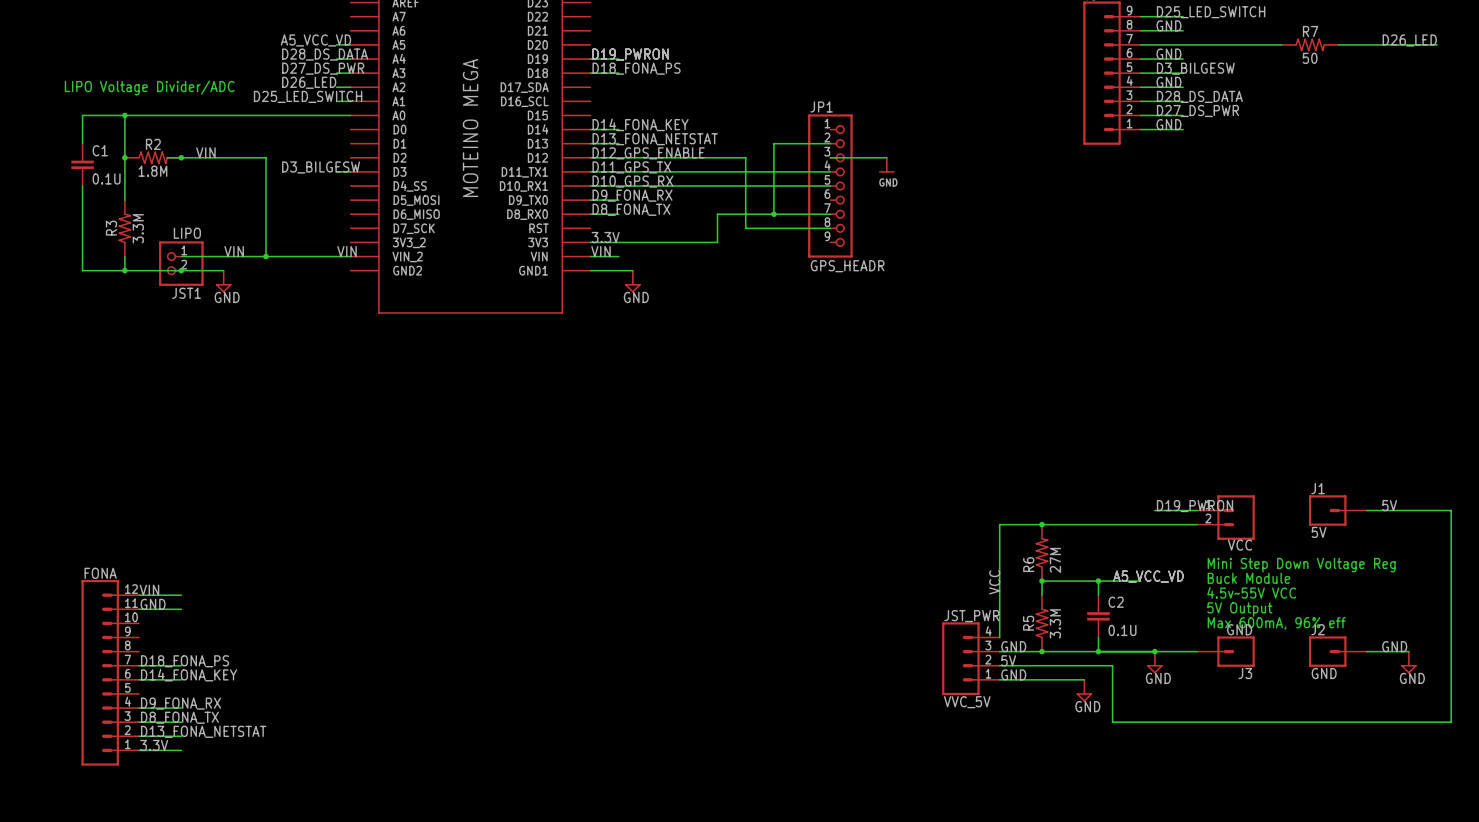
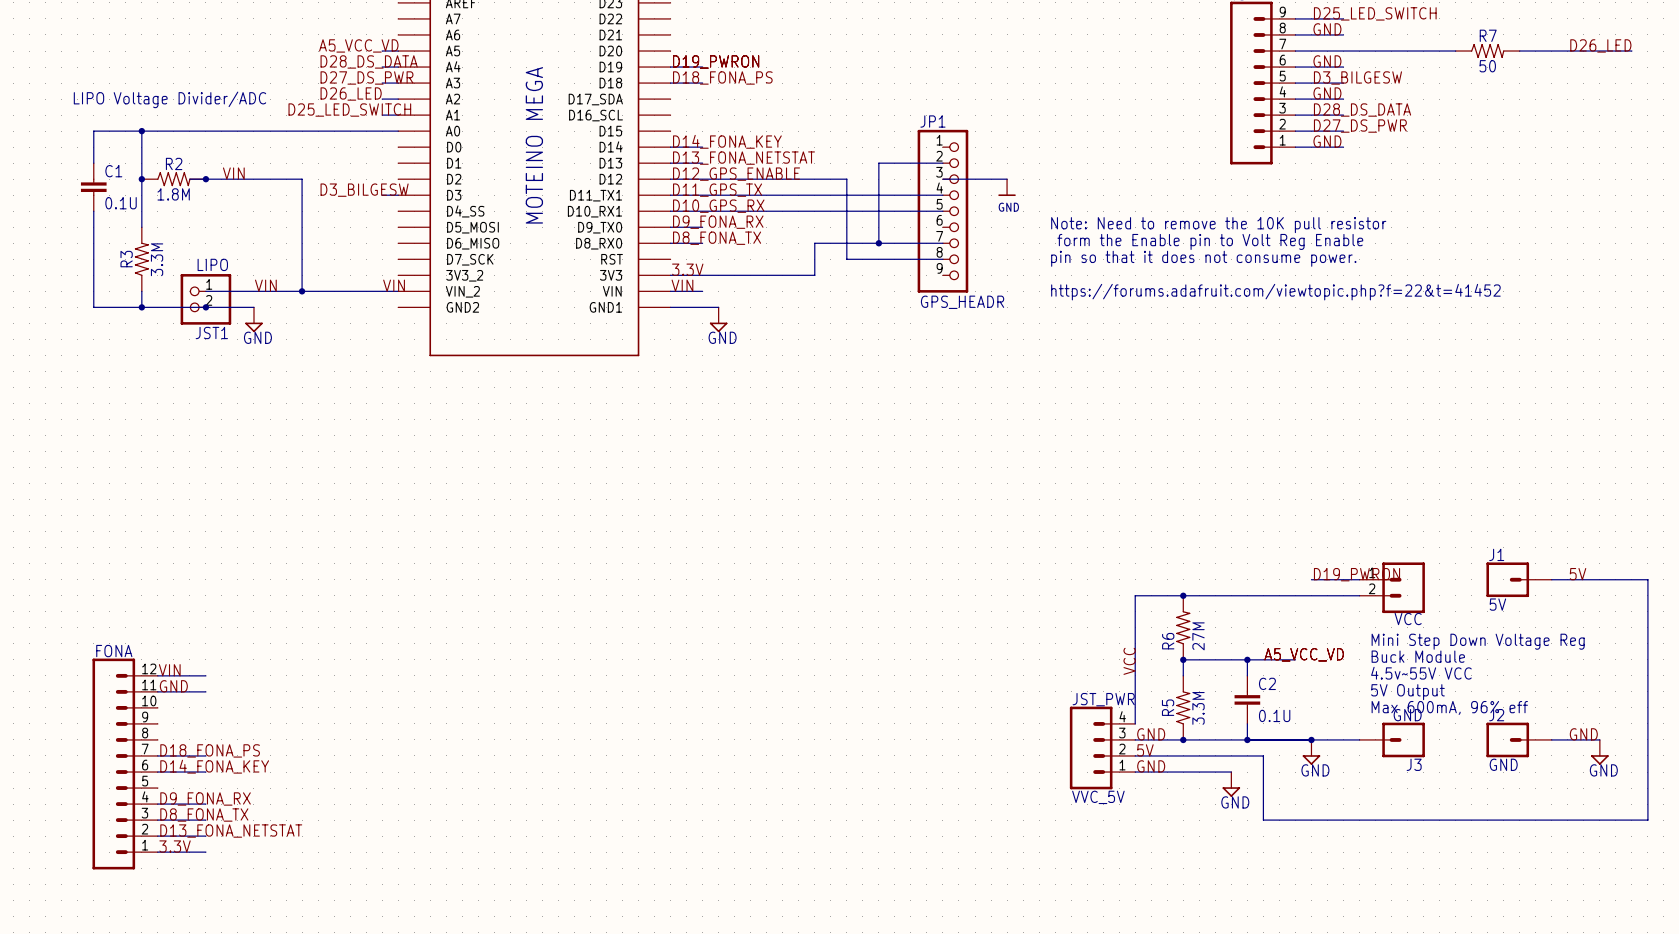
text: none -> Note: Need to remove the 10K pull resistor (1218, 225)
text: none -> form the Enable pin to Volt Reg Enable (1210, 241)
text: none -> pin so that it does not consume power. (1203, 258)
text: none -> https://forums.adafruit.com/viewtopic.php?f=22&t=41452 (1275, 292)

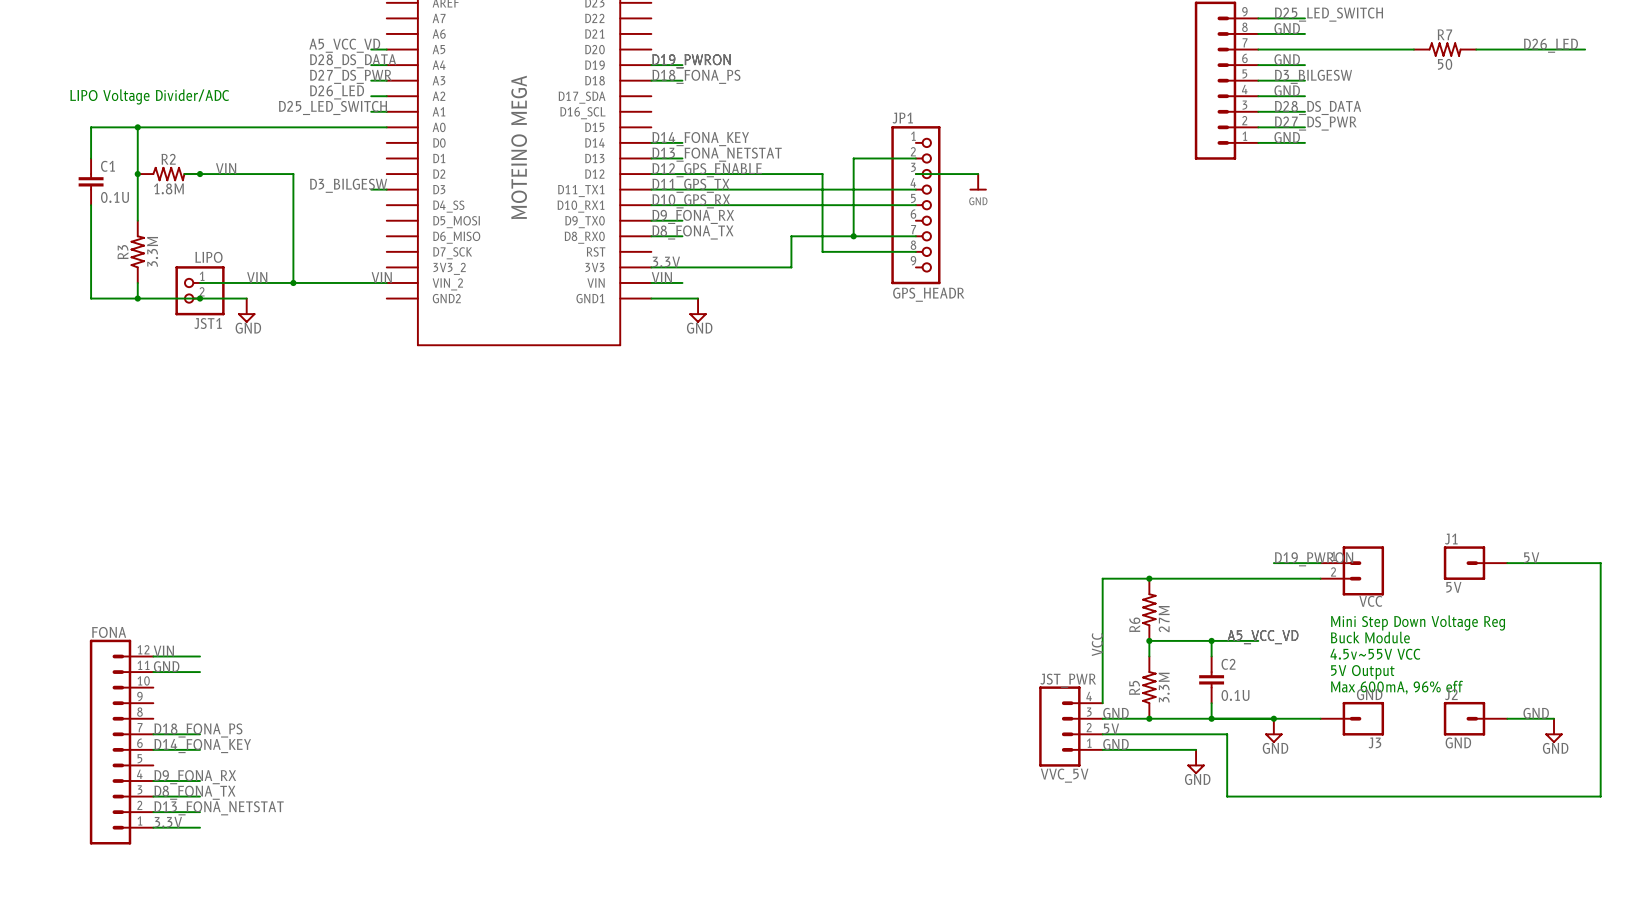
text: Note: Need to remove the 10K pull resistor (1218, 225) -> none
text: form the Enable pin to Volt Reg Enable (1210, 241) -> none
text: pin so that it does not consume power. (1203, 258) -> none
text: https://forums.adafruit.com/viewtopic.php?f=22&t=41452 (1275, 292) -> none

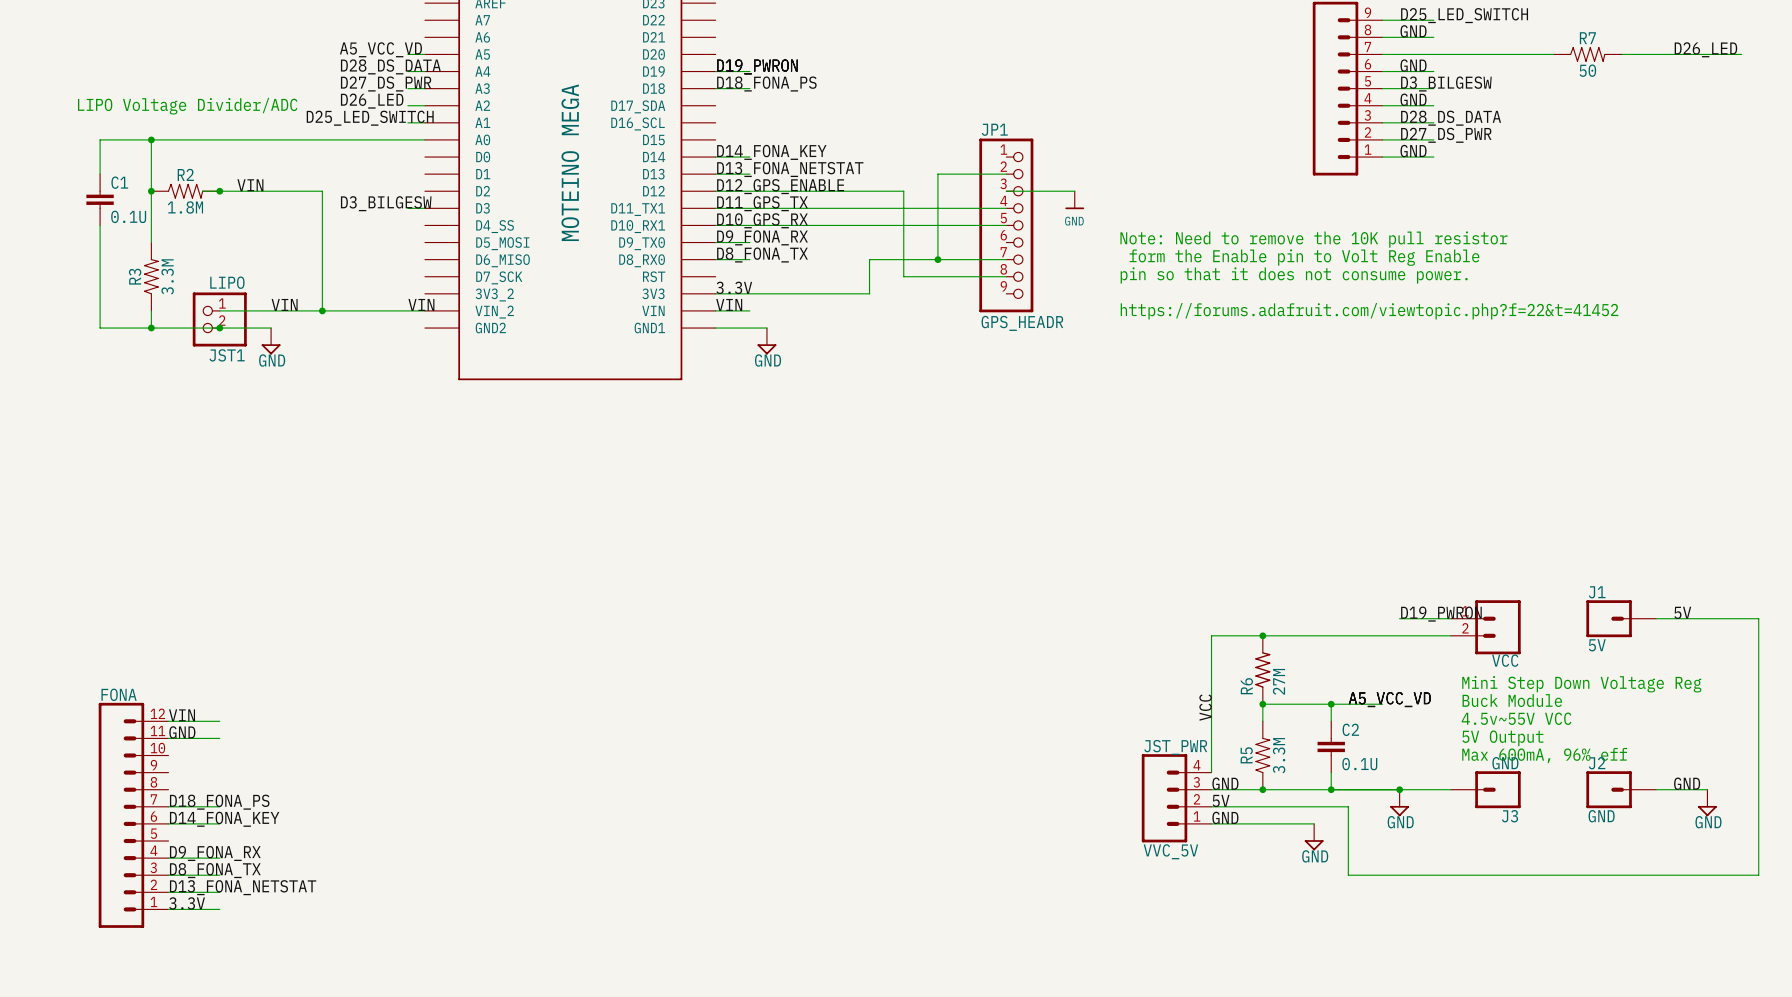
text: none -> Note: Need to remove the 10K pull resistor (1313, 239)
text: none -> form the Enable pin to Volt Reg Enable (1304, 257)
text: none -> pin so that it does not consume power. (1294, 275)
text: none -> https://forums.adafruit.com/viewtopic.php?f=22&t=41452 (1369, 311)

